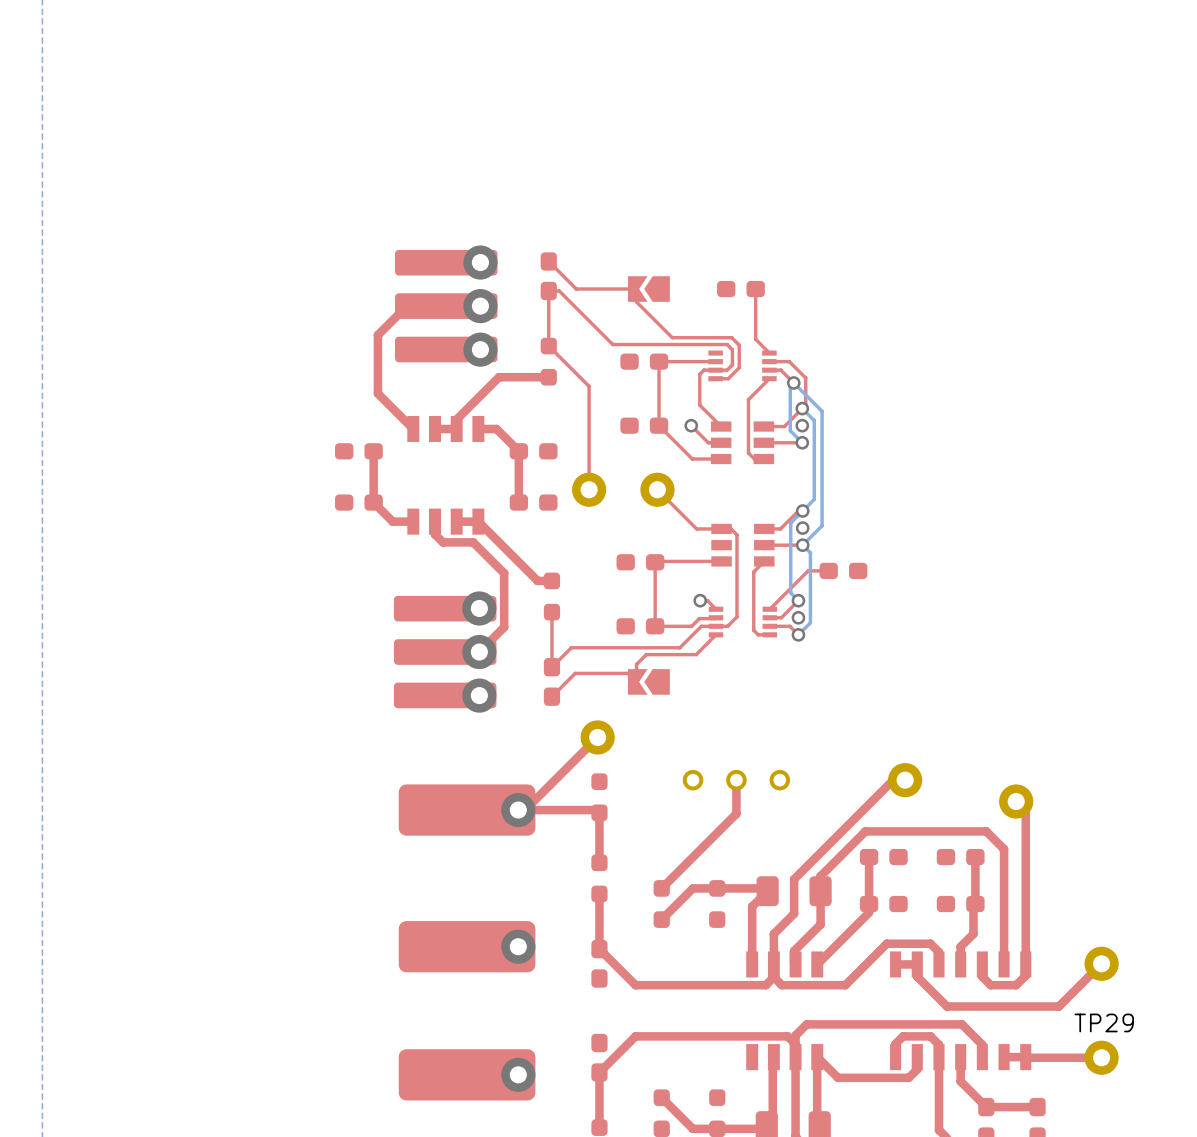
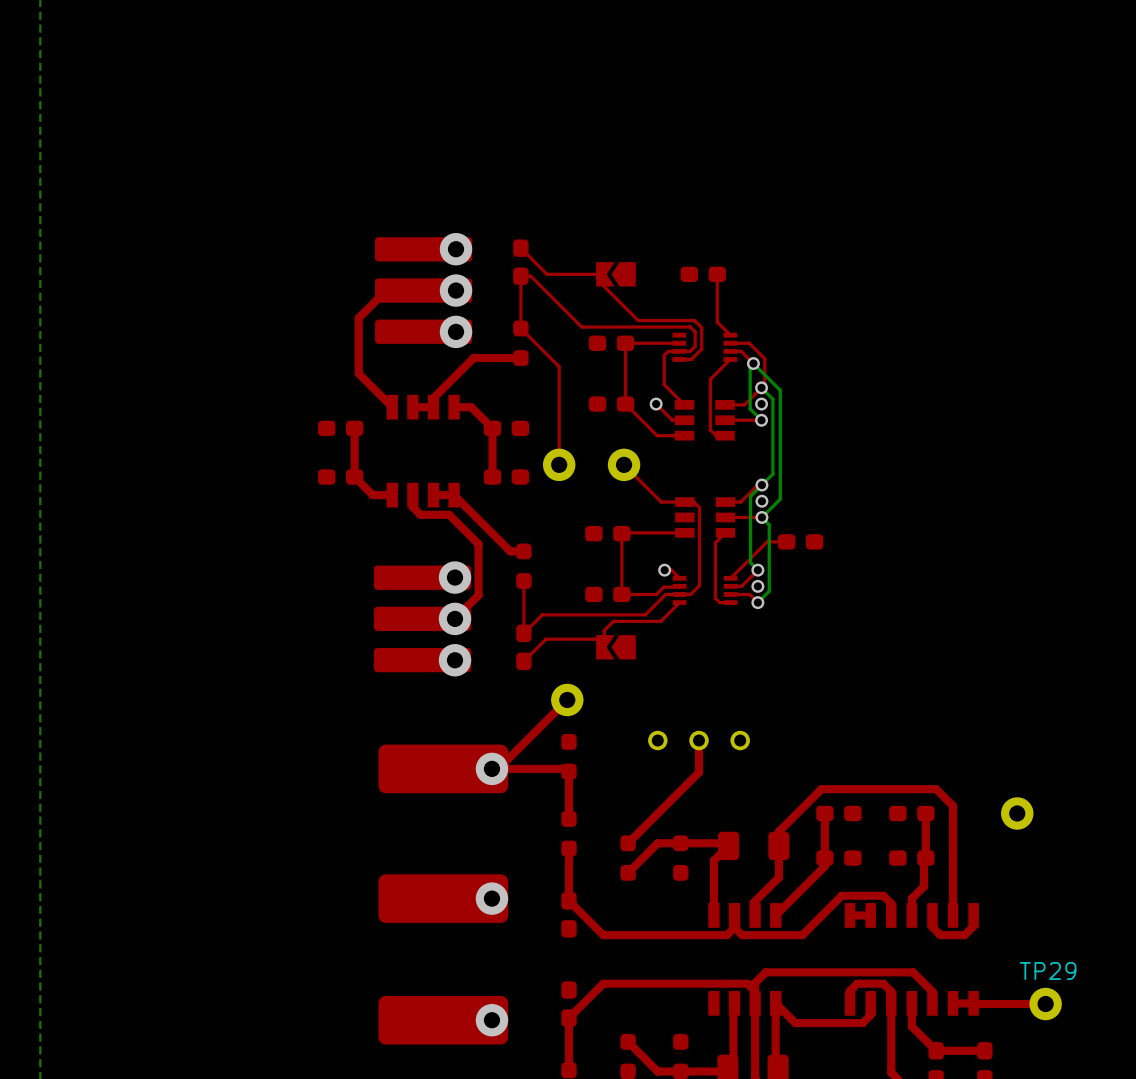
top track: (905, 780) (893, 780) (794, 879) (794, 913) (773, 934) (773, 964) -> none
part: (905, 780) -> none
top track: (1016, 801) (1025, 811) (1025, 964) -> none
part: (1016, 801) -> none
part: none -> (1017, 813)
top track: (1101, 963) (1058, 1006) (947, 1006) (917, 976) (917, 964) -> none
part: (1101, 963) -> none

